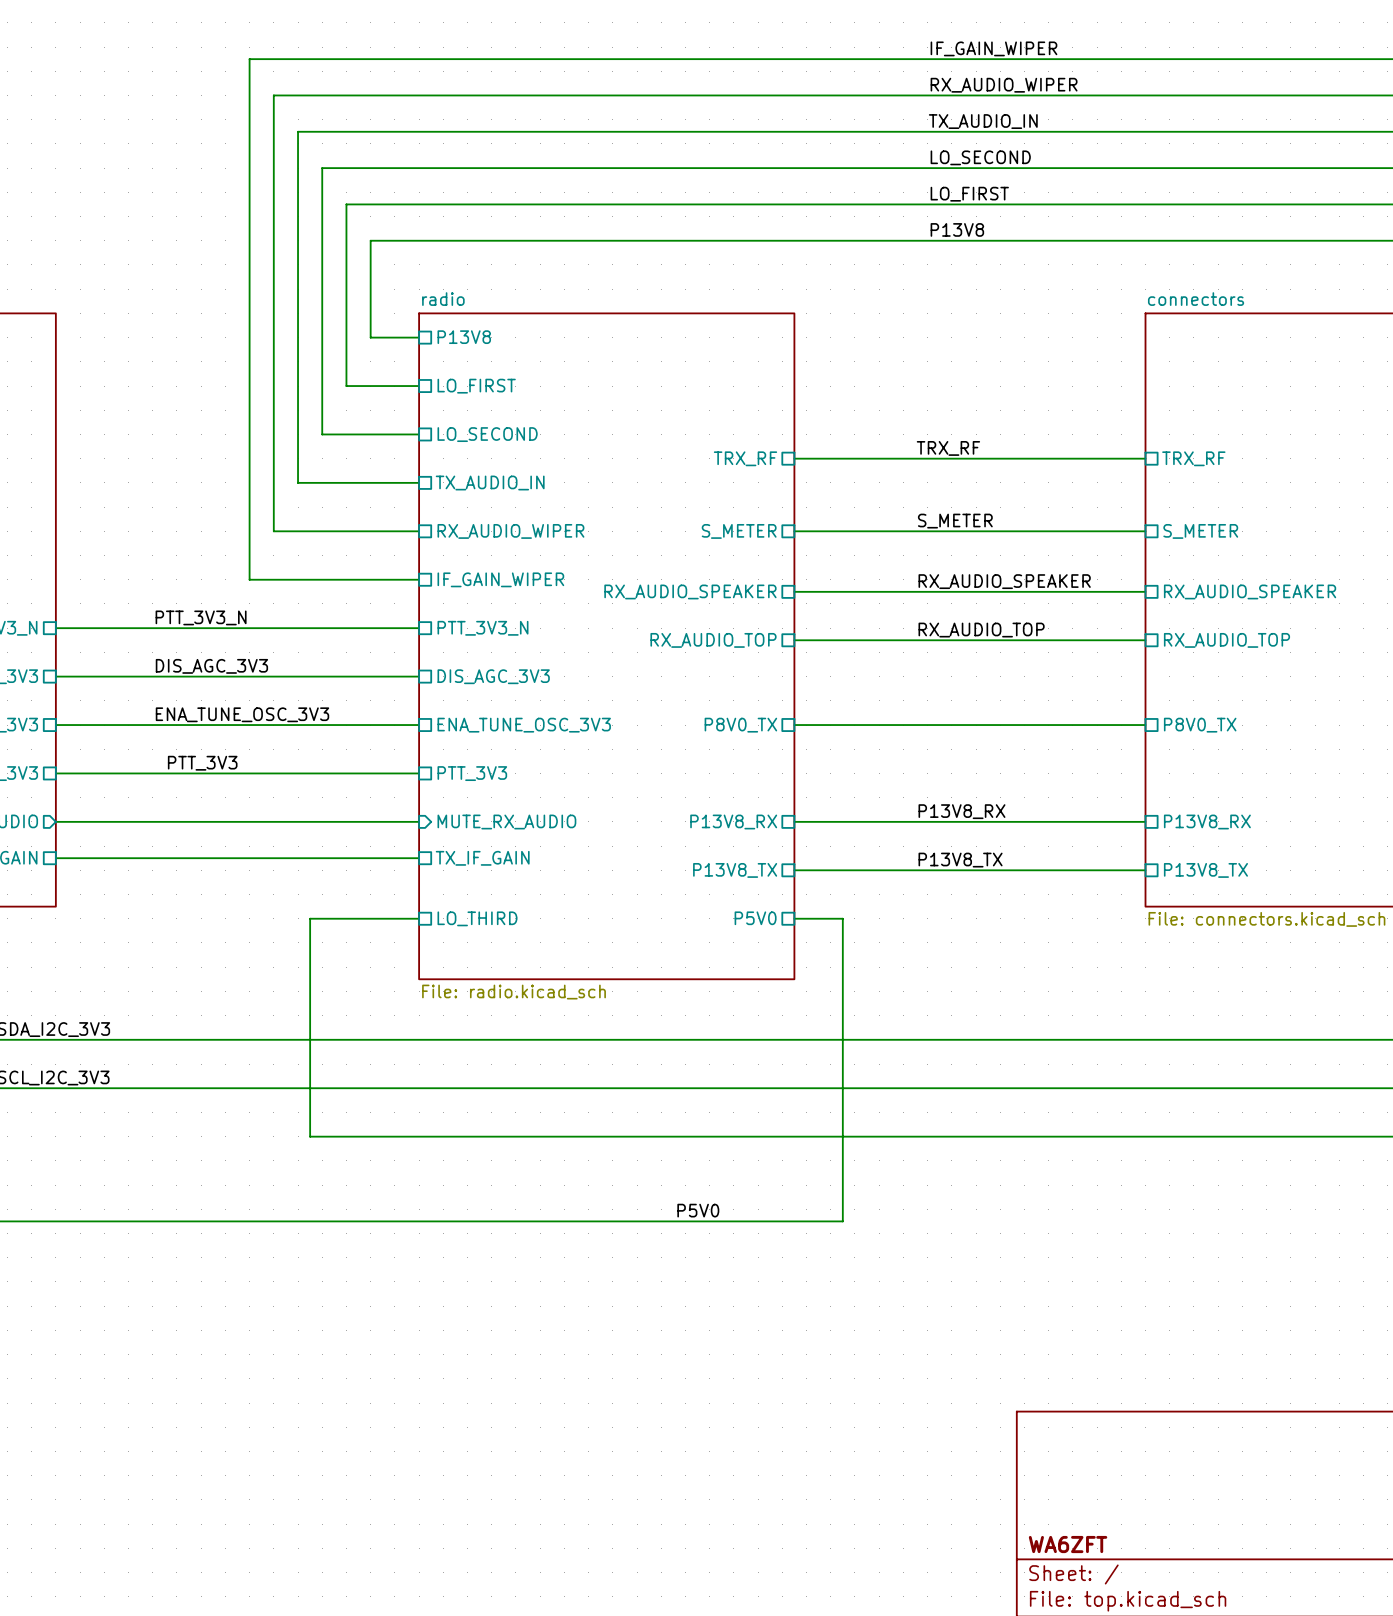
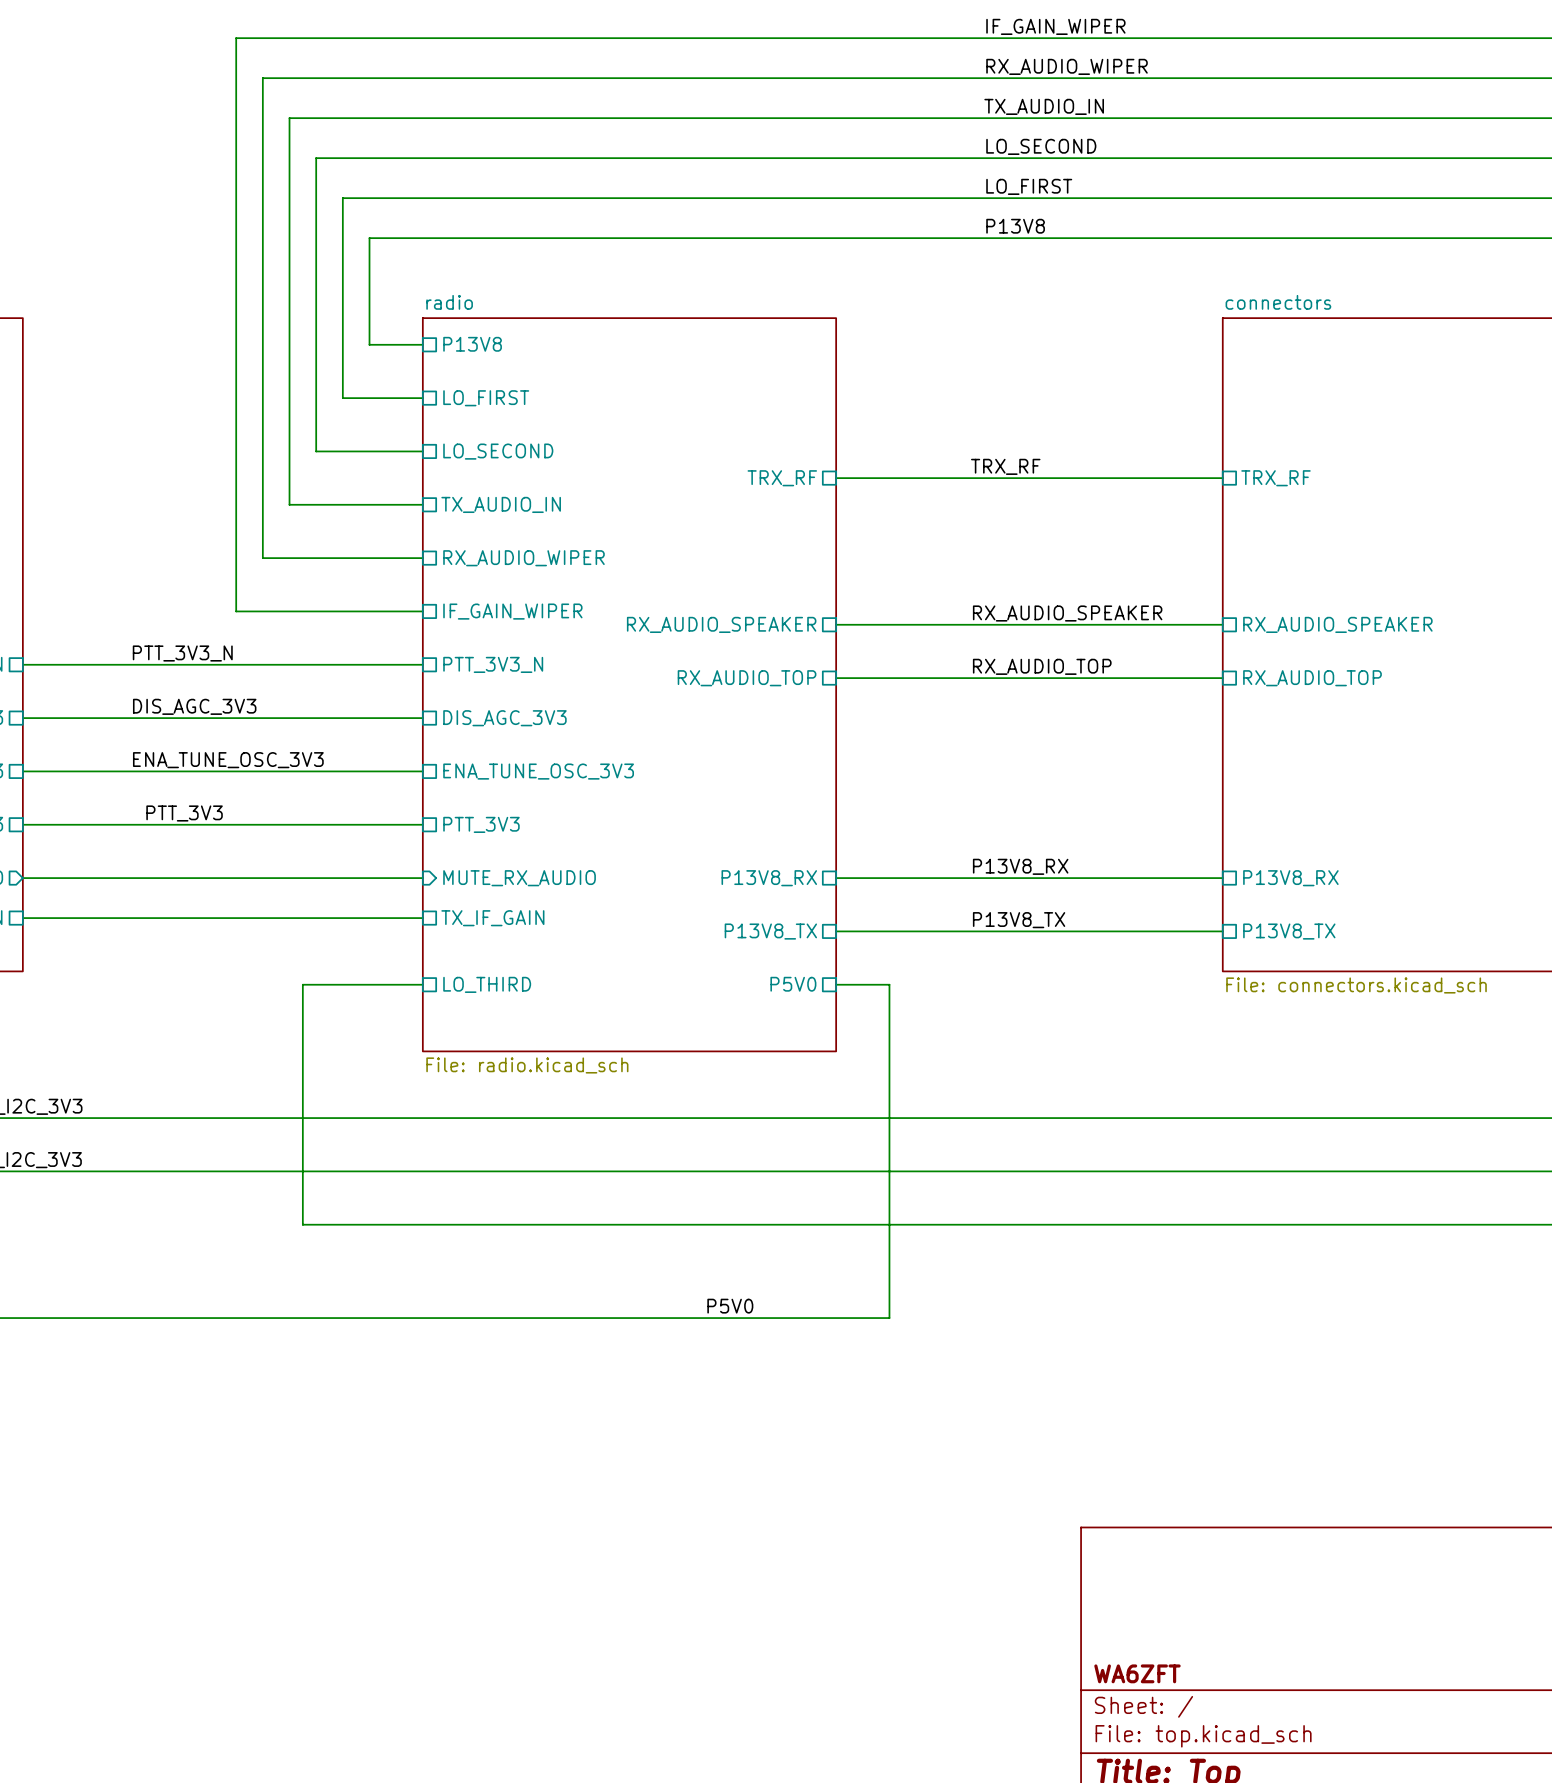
label: S_METER (955, 521) -> none
sheet pin: S_METER (739, 531) -> none
wire: (794, 531) (1145, 531) -> none
sheet pin: S_METER (1200, 531) -> none
sheet pin: P8V0_TX (740, 725) -> none
wire: (794, 725) (1145, 725) -> none
sheet pin: P8V0_TX (1200, 725) -> none

